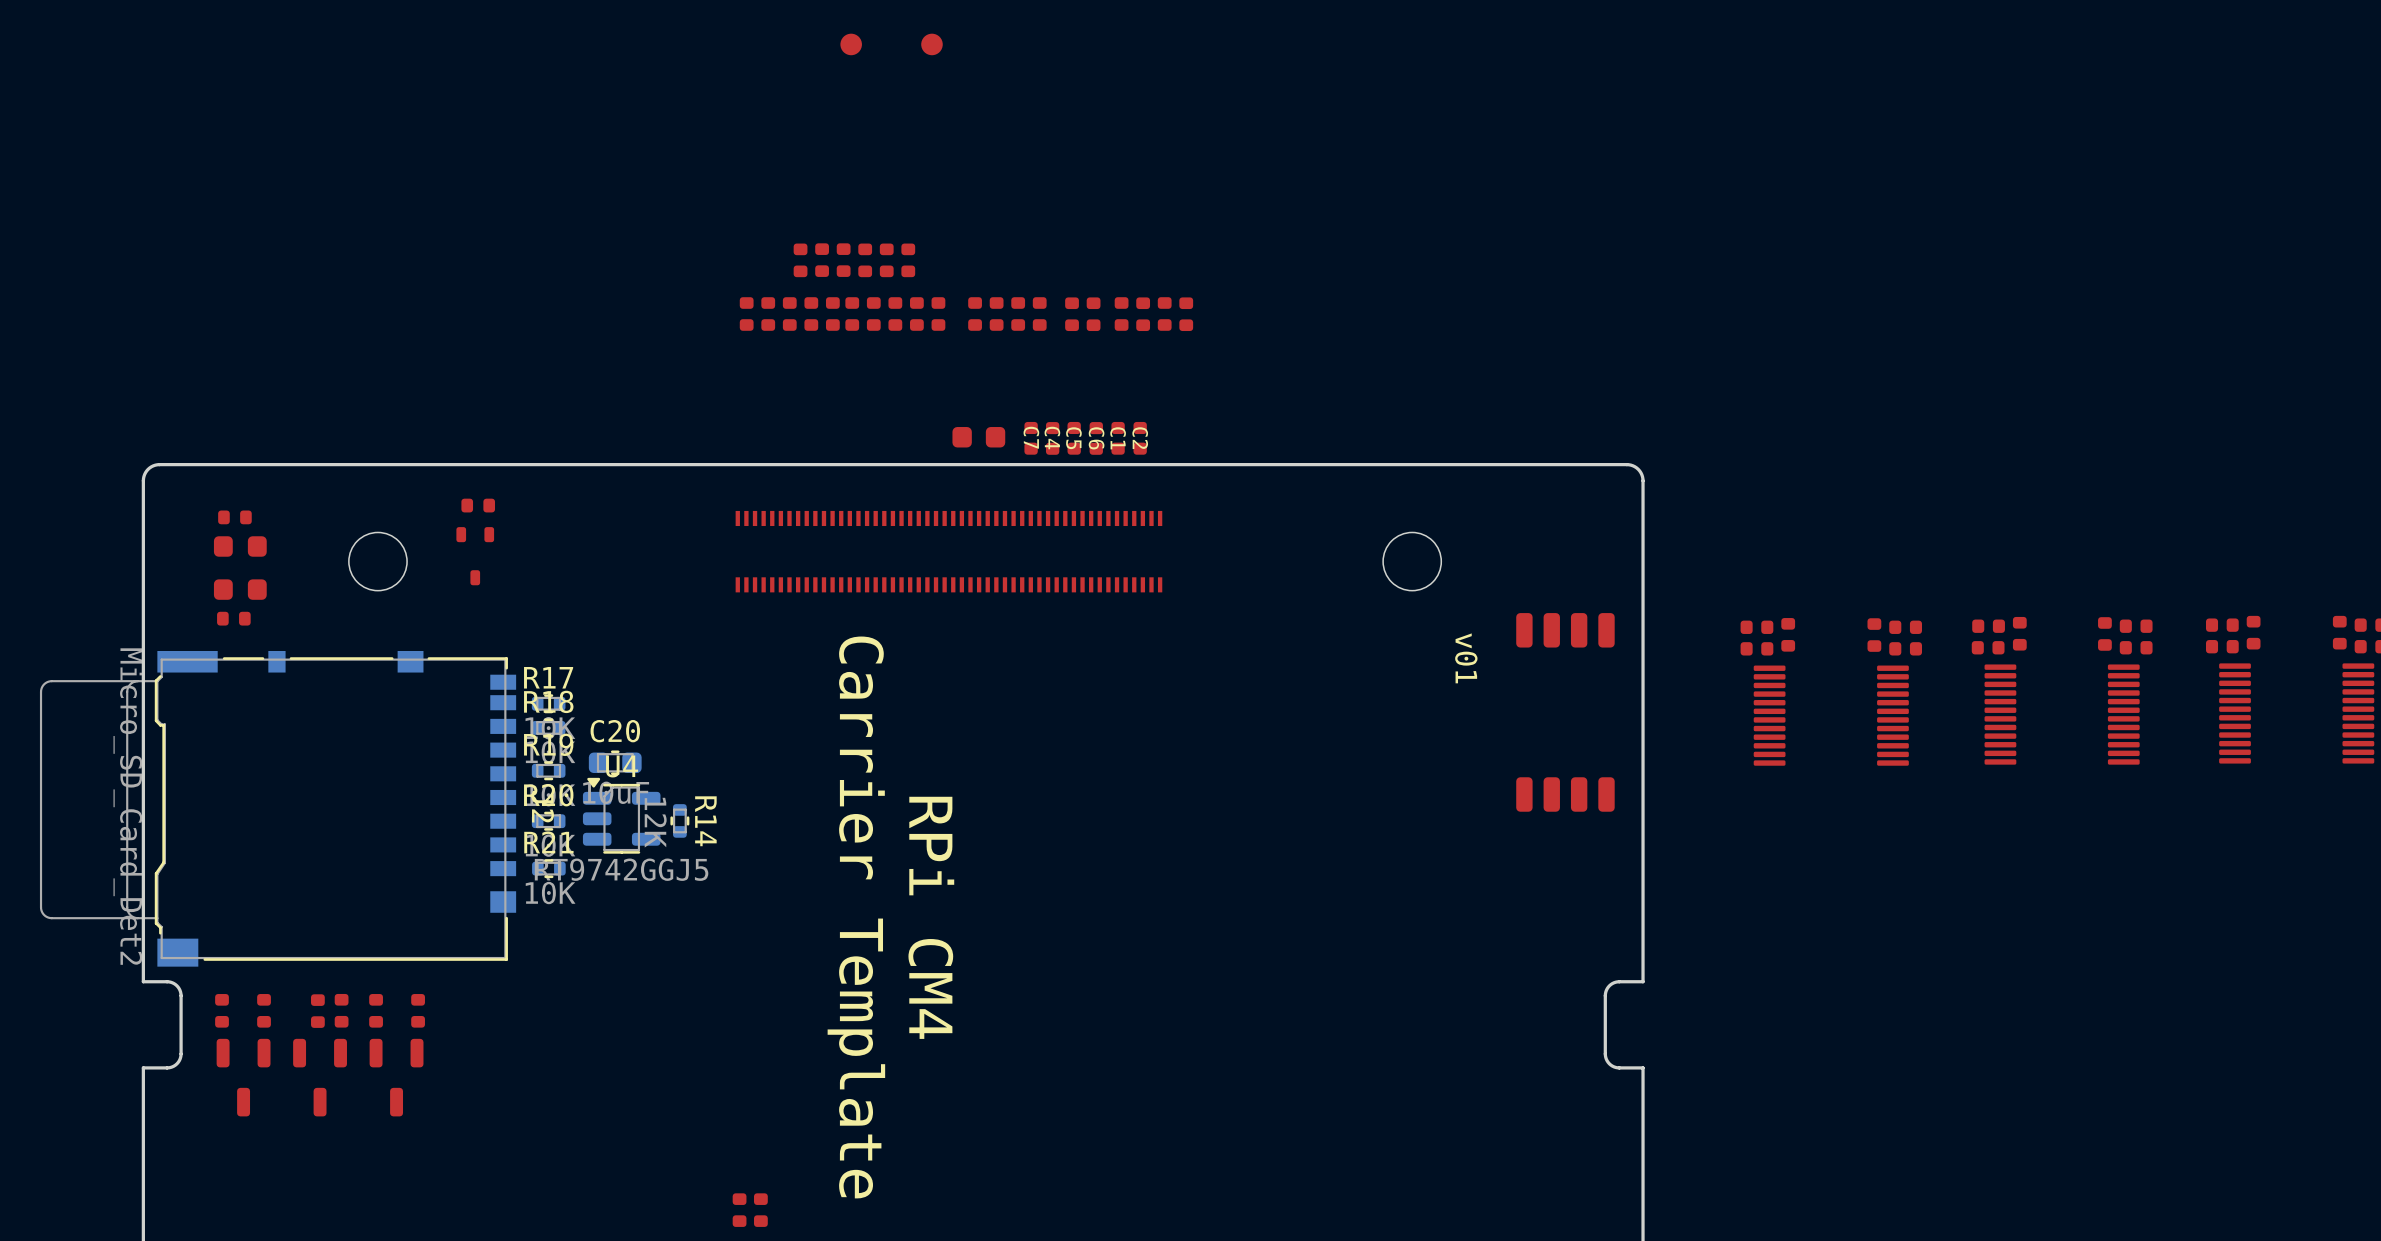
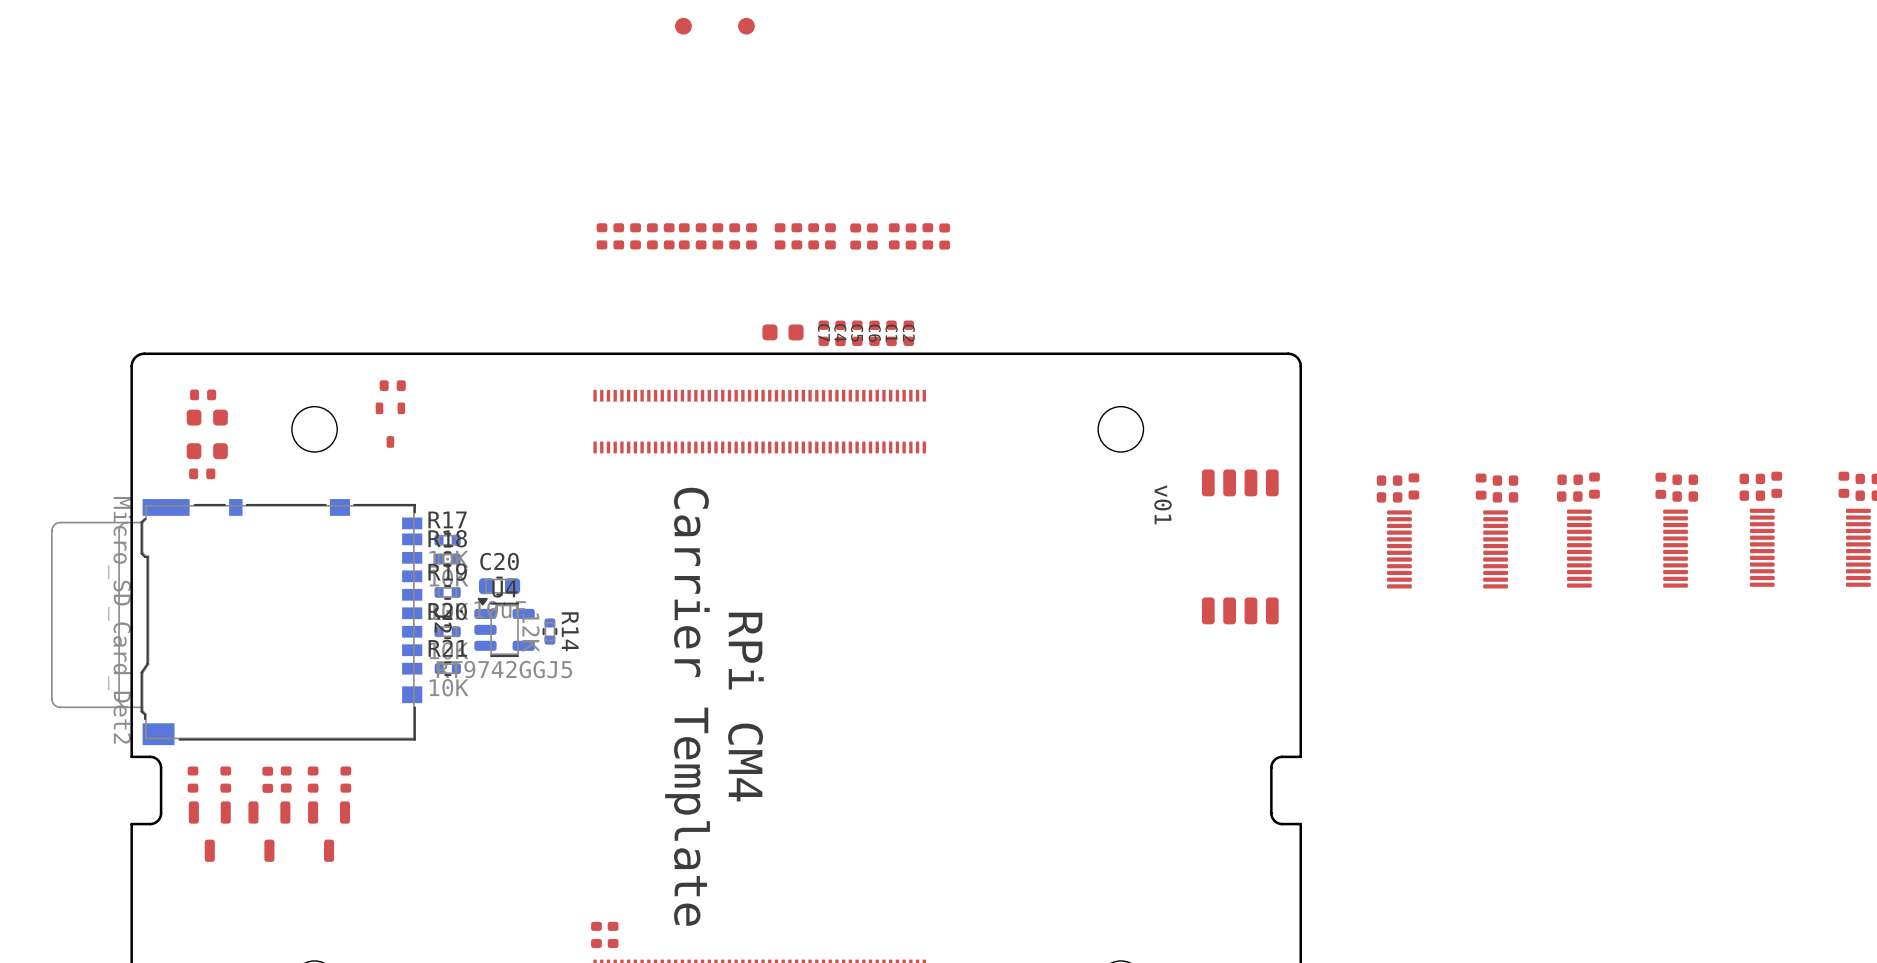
part: (800, 260) -> none
part: (822, 260) -> none
part: (843, 260) -> none
part: (865, 260) -> none
part: (886, 260) -> none
part: (908, 260) -> none

